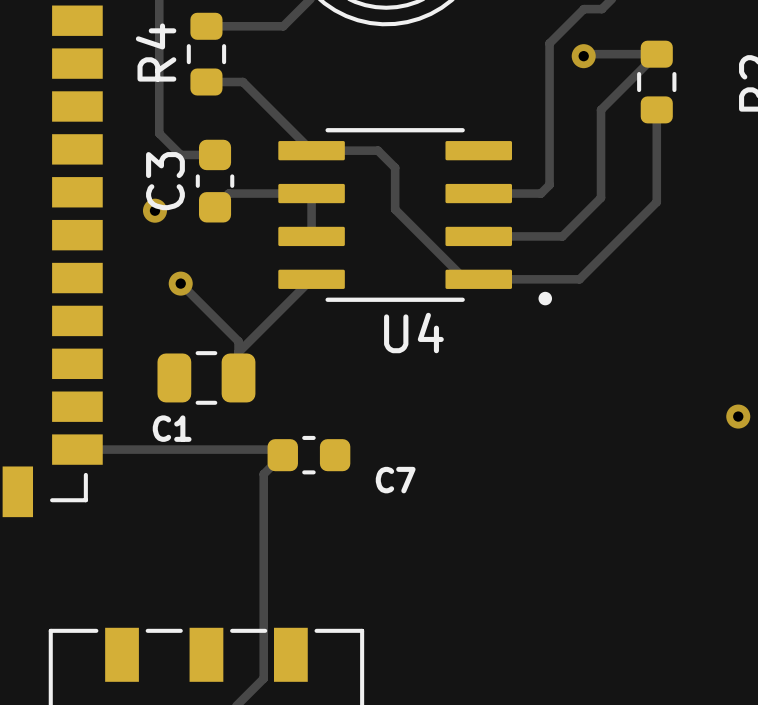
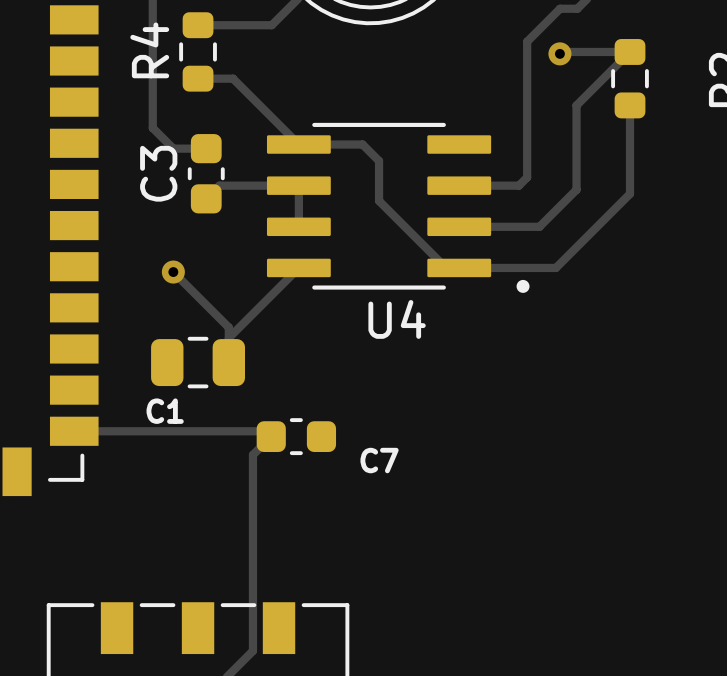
via: (154, 210) -> none
via: (738, 416) -> none

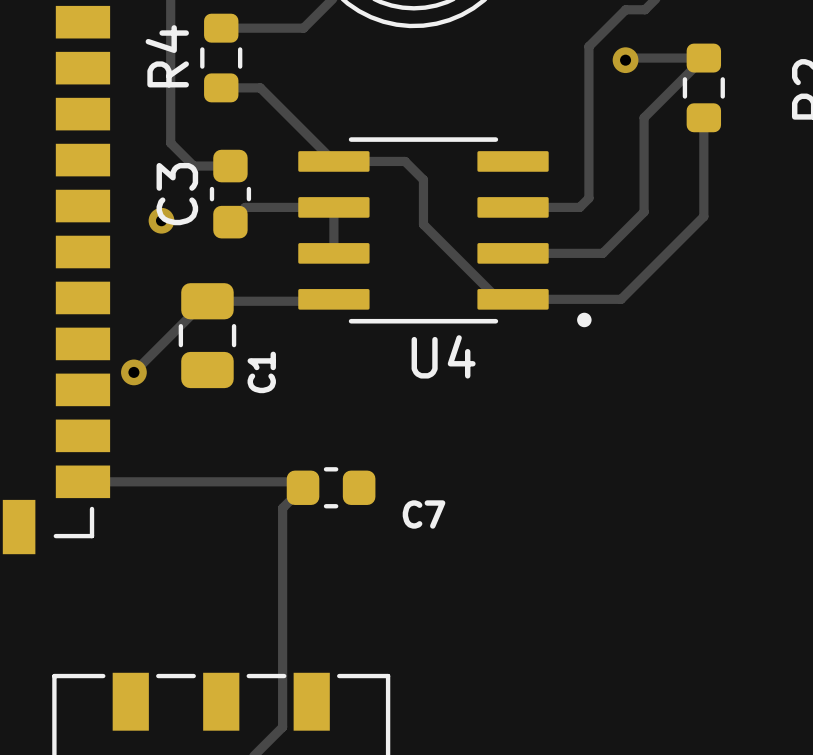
via: none -> (161, 220)
track: (297, 269) (228, 338) -> (331, 301) (205, 301) (133, 372)
track: (173, 272) (228, 327) (228, 362) -> none
via: (173, 272) -> none
via: none -> (133, 372)
C1 rotation: 0° (198, 362) -> 90° clockwise (207, 335)
C1 position: (198, 362) -> (207, 335)
C1 name position: C1 (165, 411) -> C1 (261, 372)

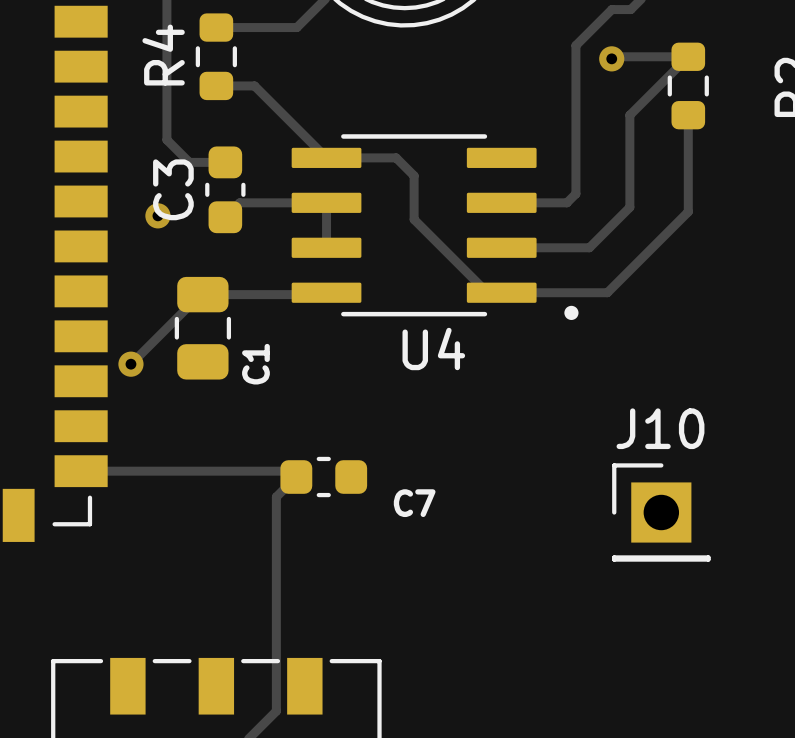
J10: none -> (661, 512)

